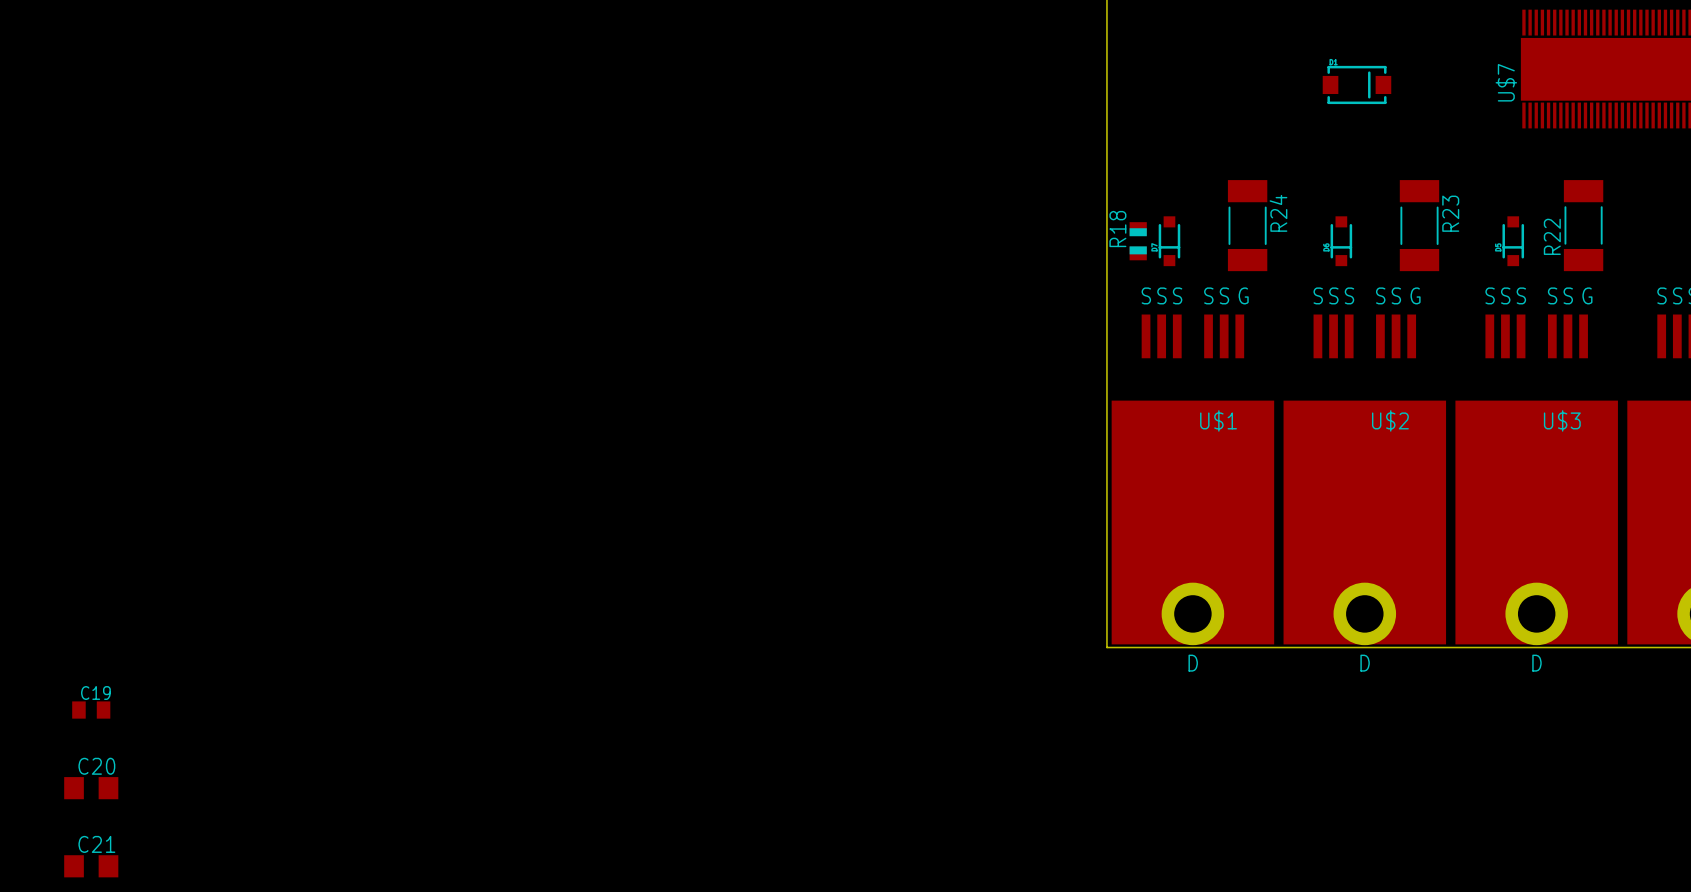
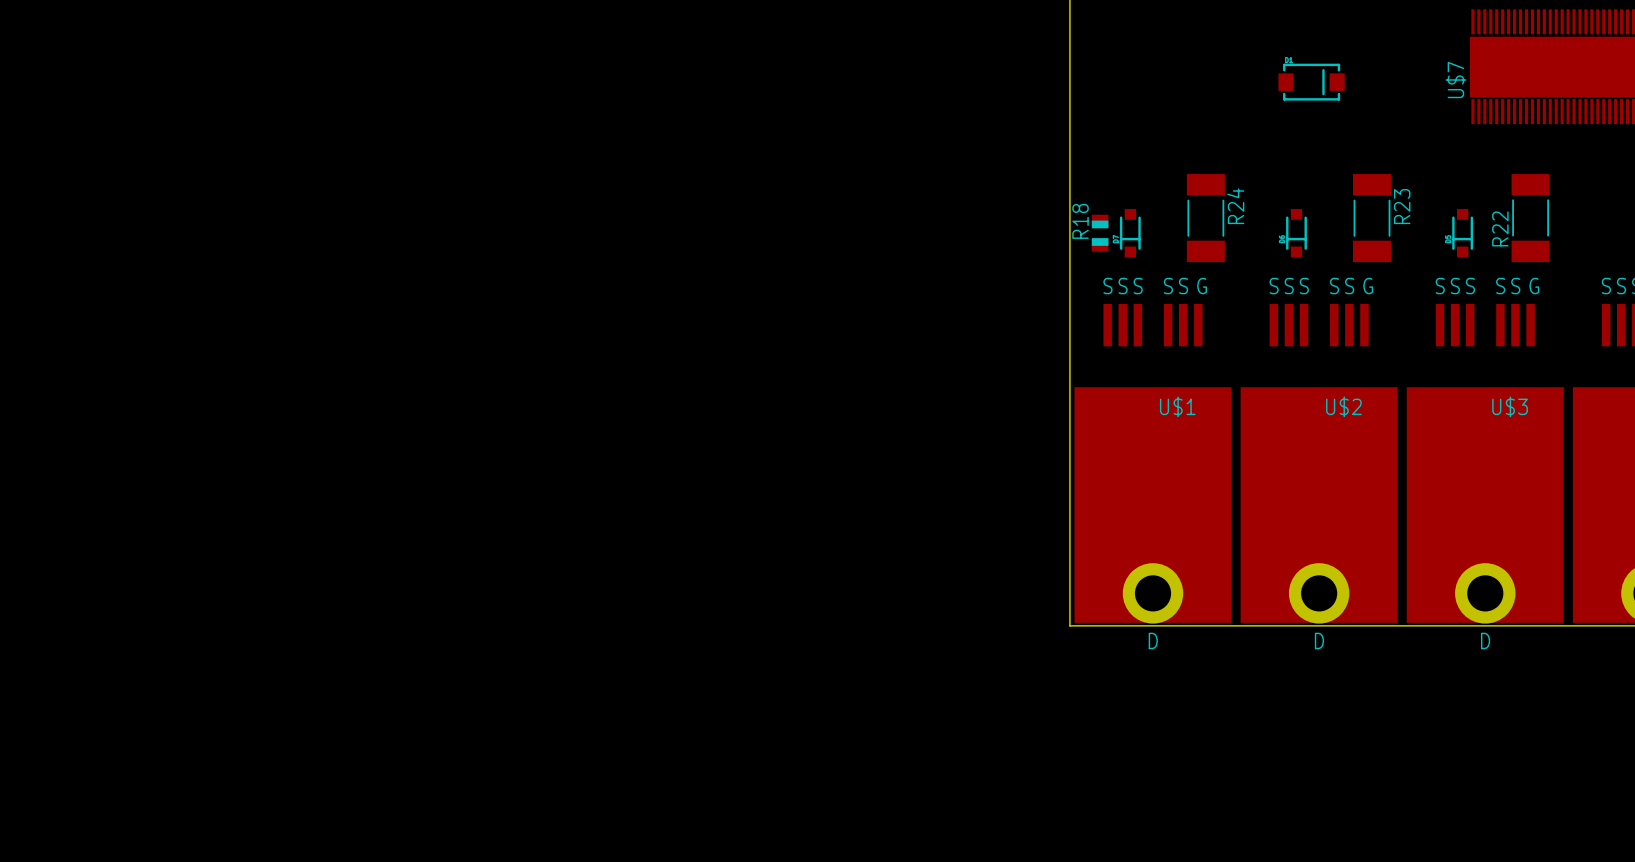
C19: (91, 710) -> none
C20: (91, 788) -> none
C21: (91, 866) -> none

